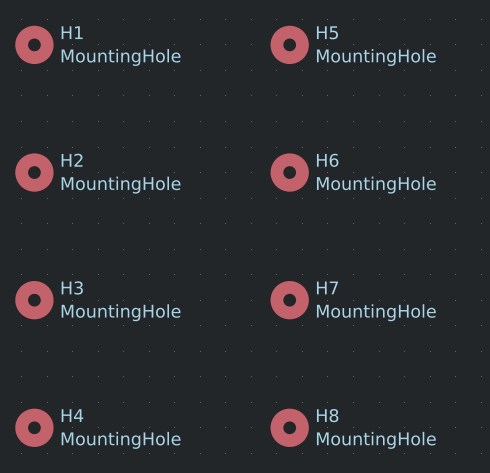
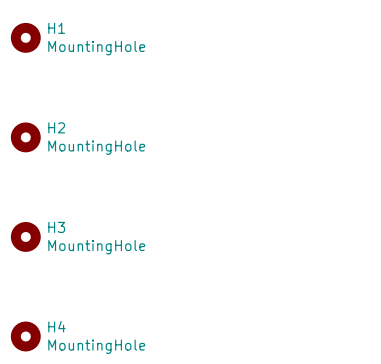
H5: MountingHole (289, 44) -> none
H6: MountingHole (289, 172) -> none
H7: MountingHole (289, 300) -> none
H8: MountingHole (289, 427) -> none

